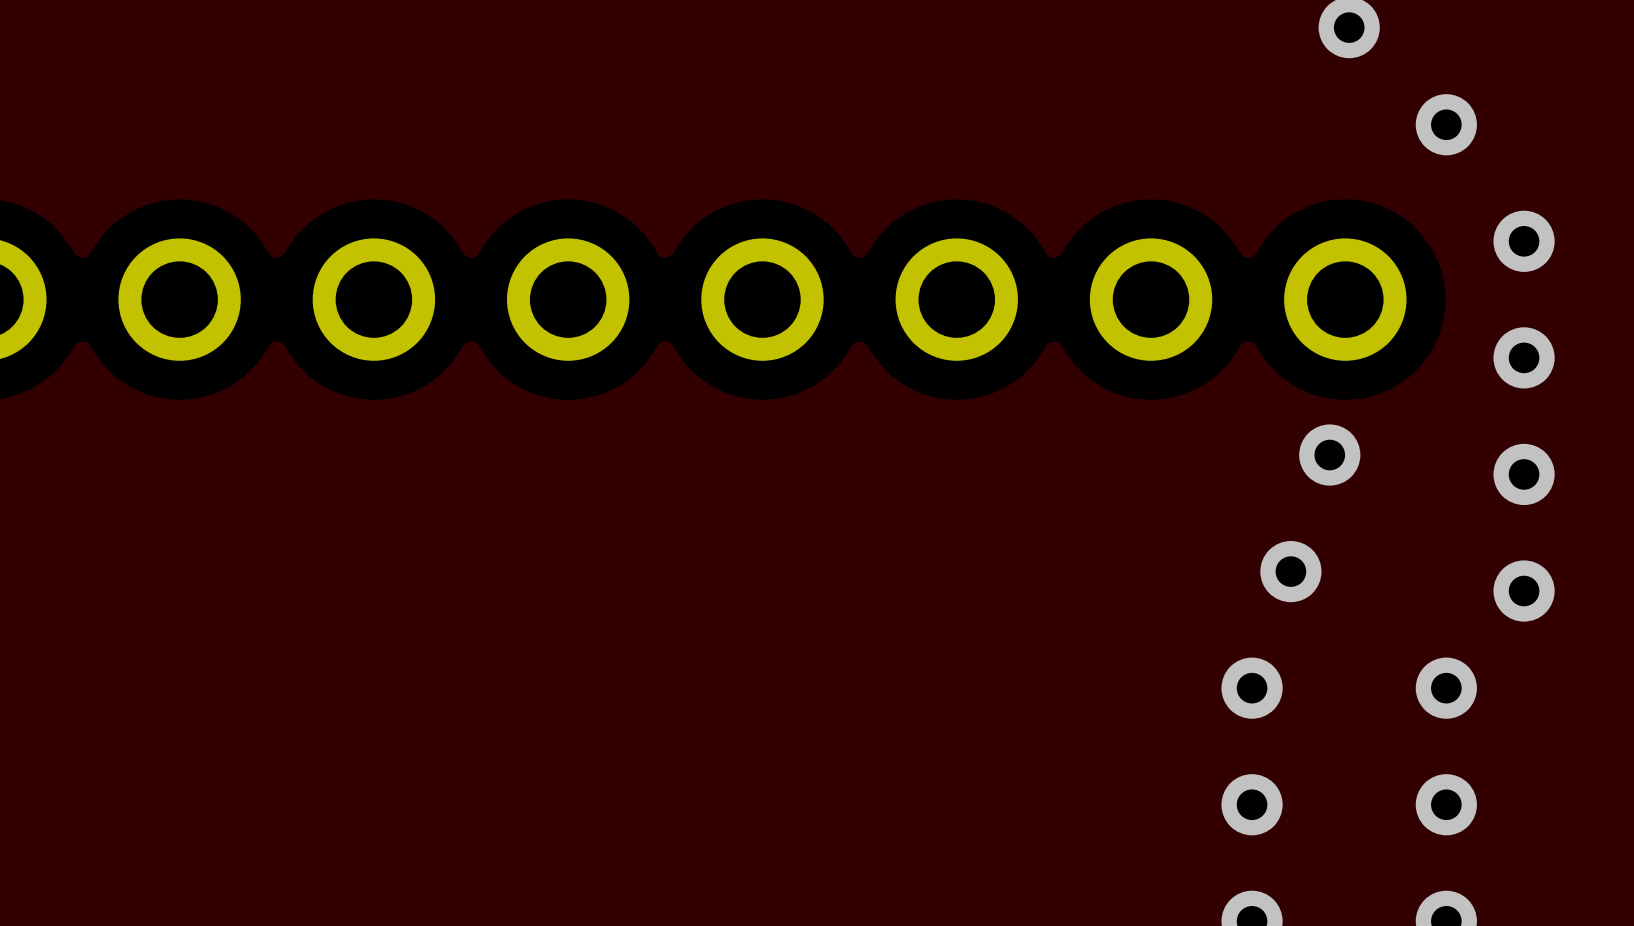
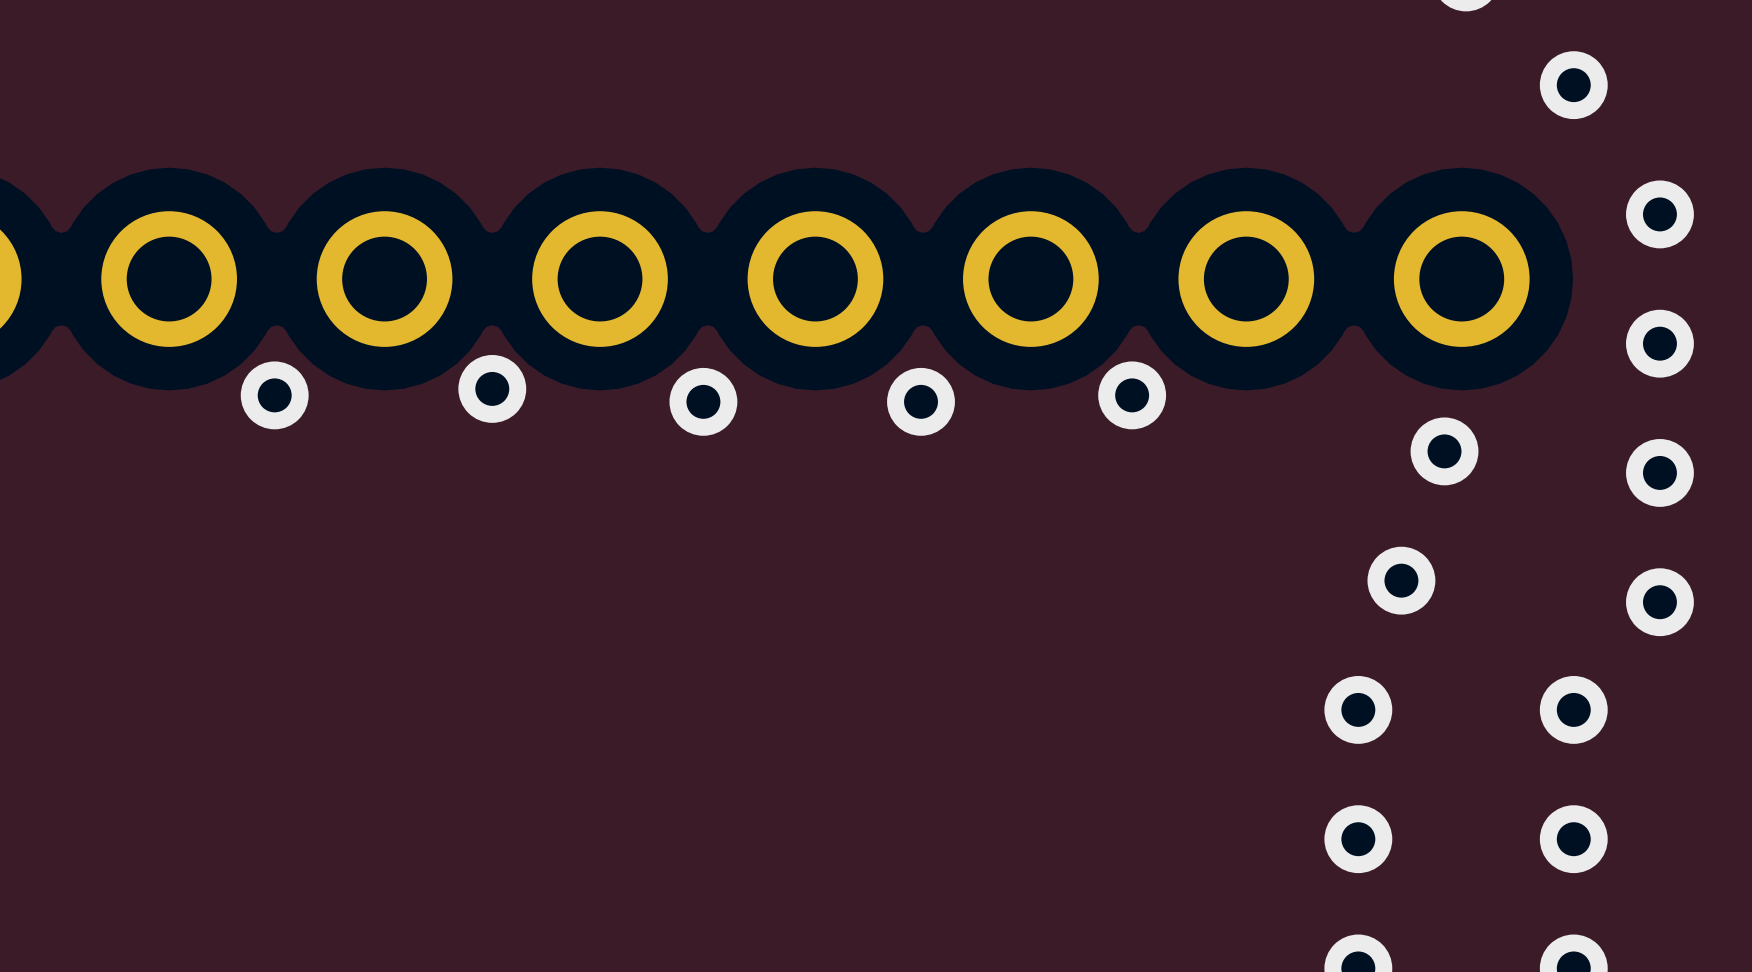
via: none -> (492, 388)
via: none -> (274, 395)
via: none -> (1132, 395)
via: none -> (703, 401)
via: none -> (921, 401)

